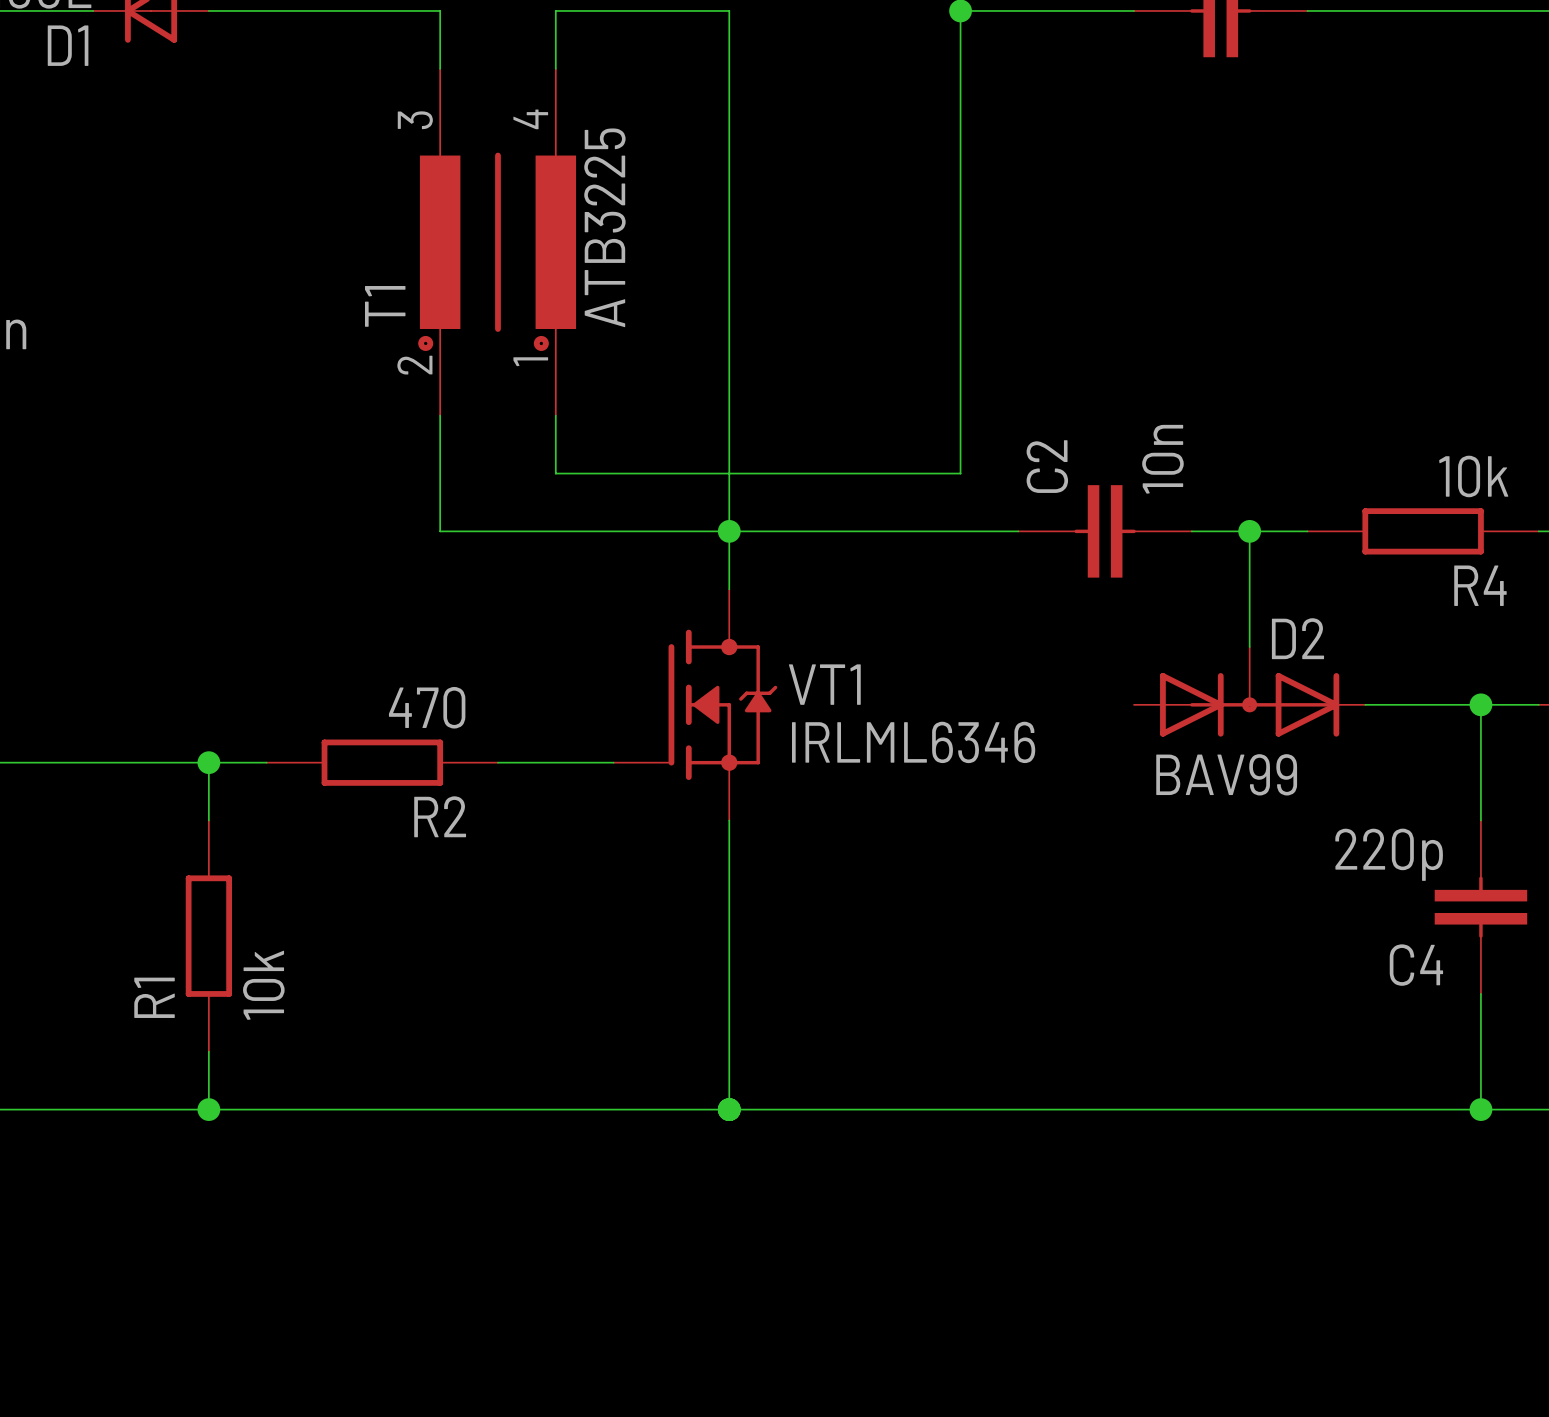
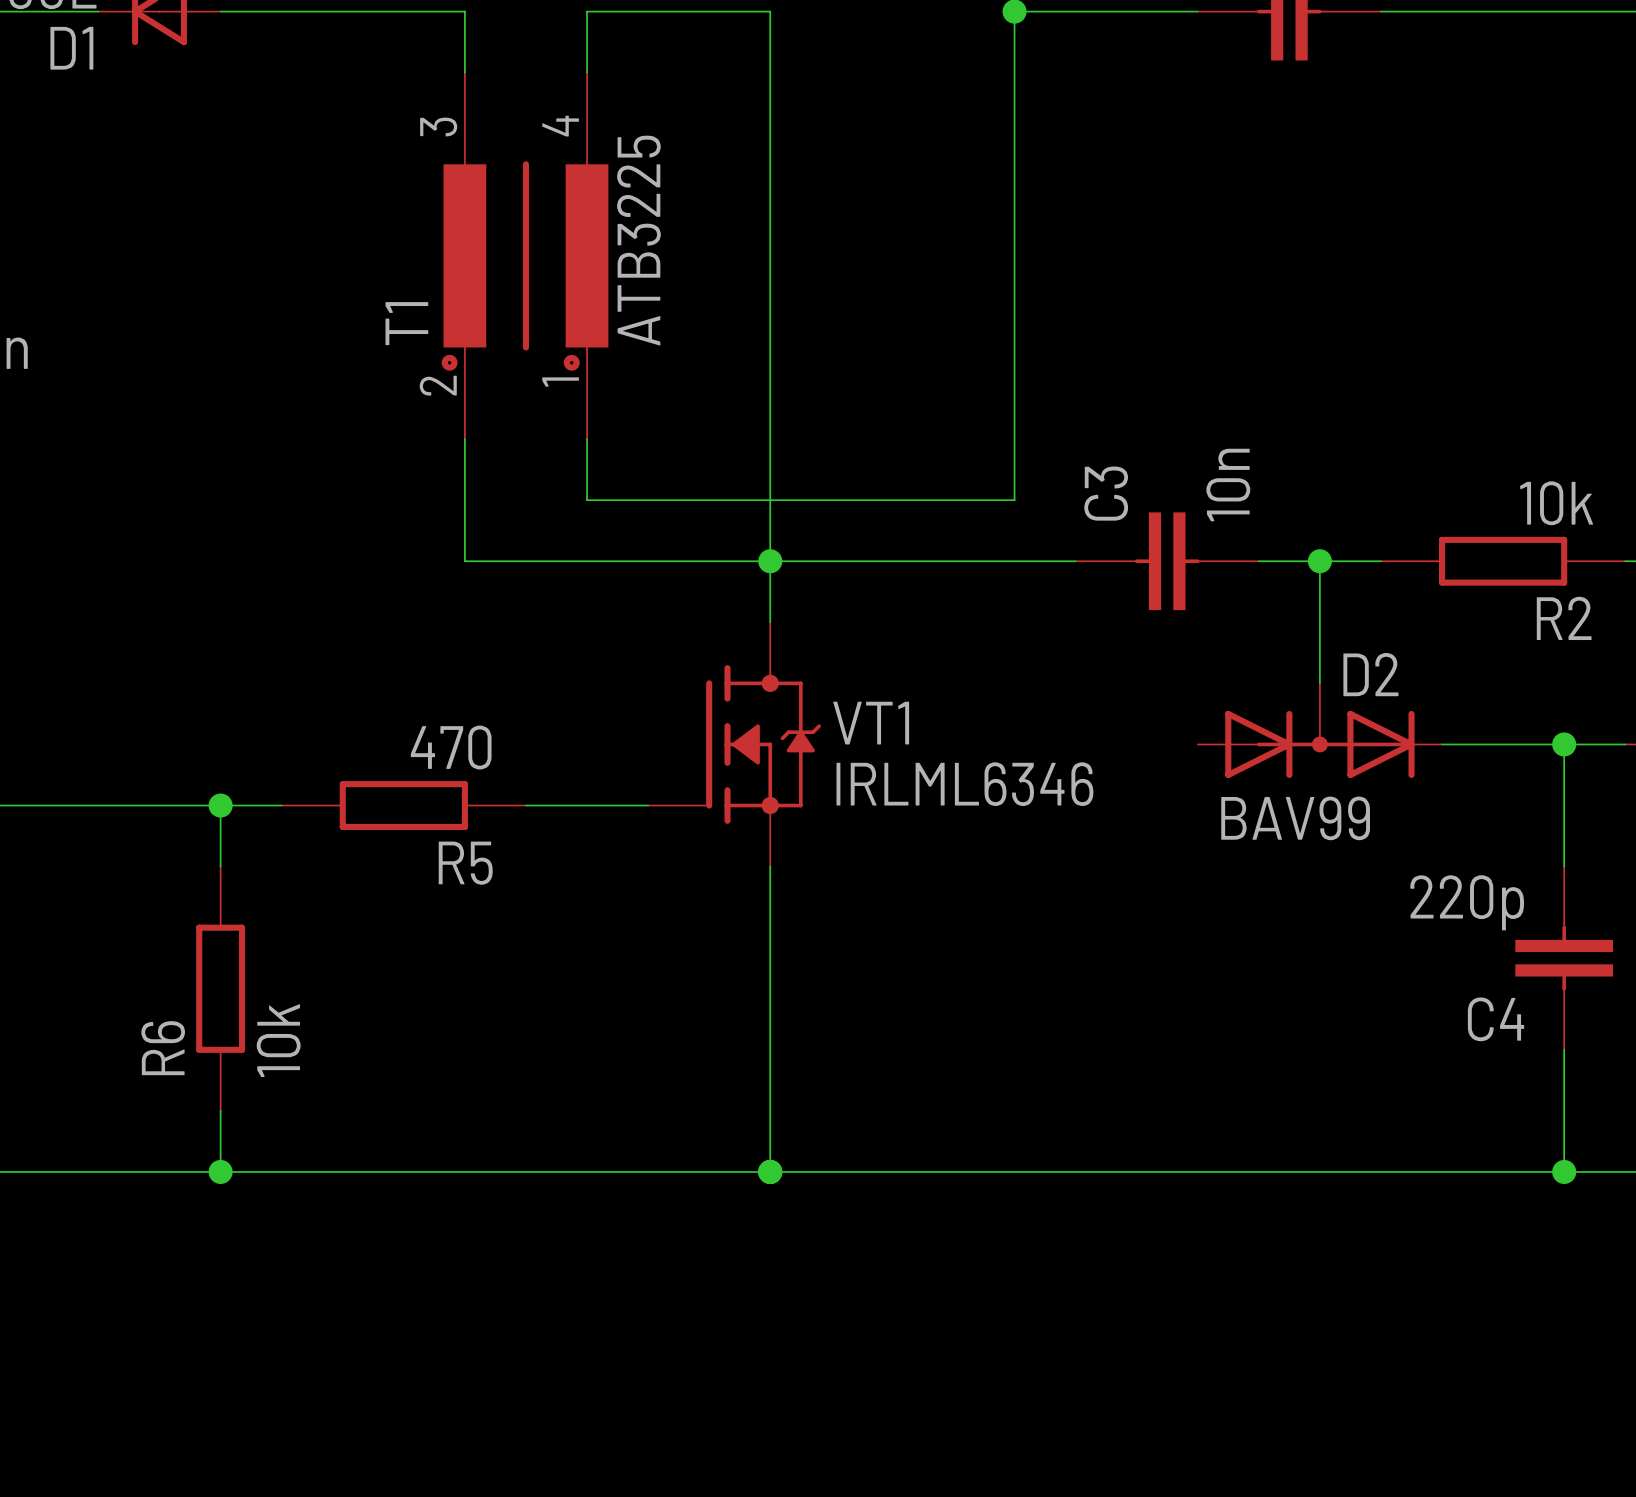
C2 name: C2 (1047, 466) -> C3 (1106, 493)
R4 name: R4 (1480, 585) -> R2 (1564, 618)
R2 name: R2 (440, 816) -> R5 (465, 863)
R1 name: R1 (154, 997) -> R6 (163, 1048)

